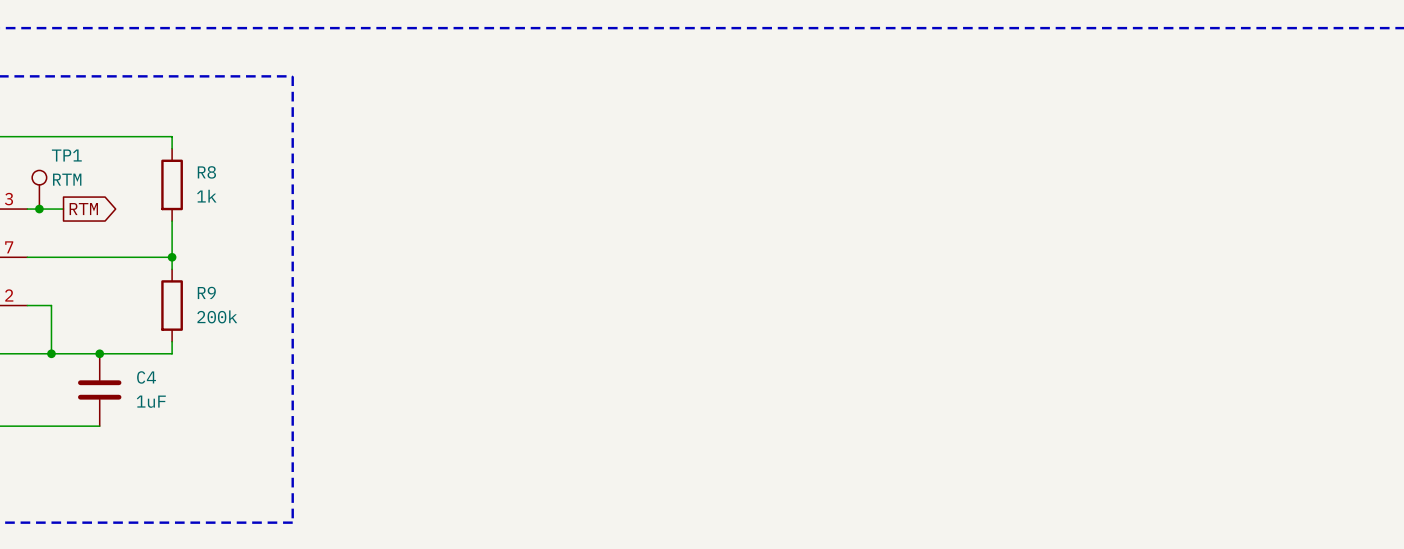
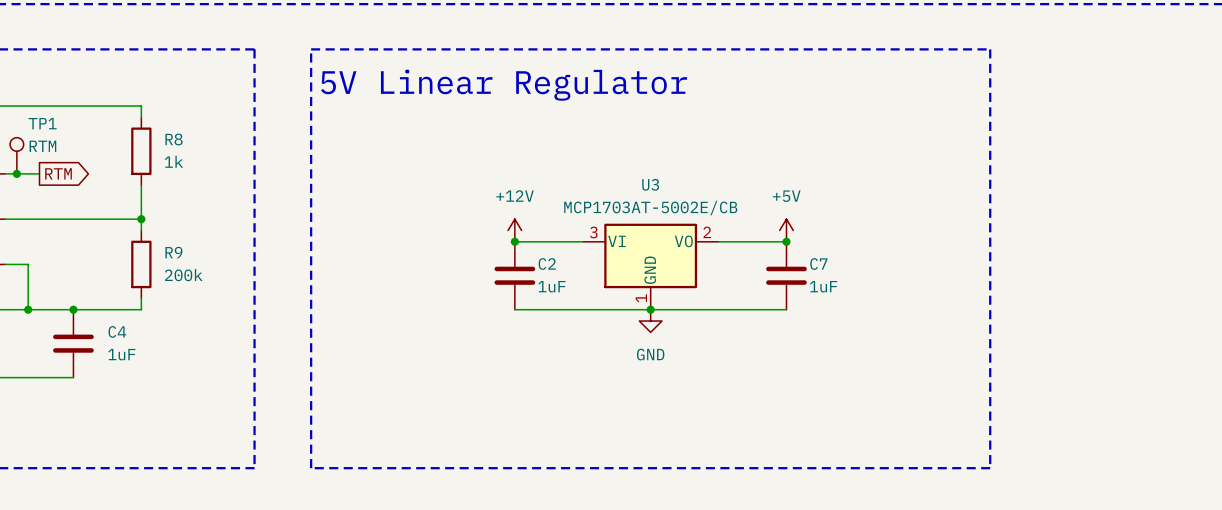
line: none -> (311, 49) (990, 49) (990, 468) (311, 468) (311, 49)
text: none -> 5V Linear Regulator (504, 85)
power symbol: none -> +12V (514, 230)
power symbol: none -> +5V (786, 230)
wire: none -> (514, 241) (582, 241)
junction: none -> (514, 241)
wire: none -> (718, 241) (786, 241)
junction: none -> (786, 241)
U3: none -> MCP1703AT-5002E/CB (650, 266)
C2: none -> 1uF (514, 275)
C7: none -> 1uF (786, 275)
wire: none -> (514, 309) (786, 309)
junction: none -> (650, 309)
power symbol: none -> GND (650, 321)

